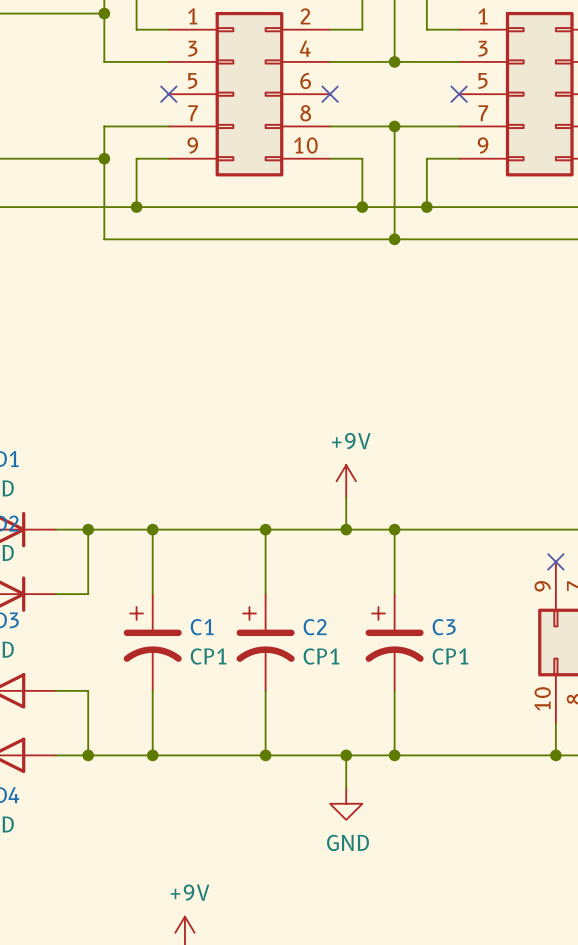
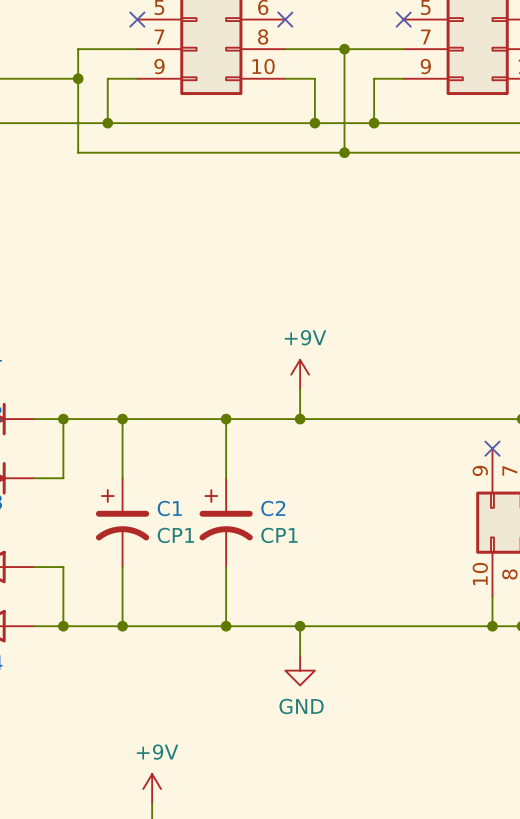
wire: (394, 529) (394, 594) -> none
junction: (394, 529) -> none
C3: CP1 (394, 642) -> none
wire: (394, 690) (394, 755) -> none
junction: (394, 755) -> none

